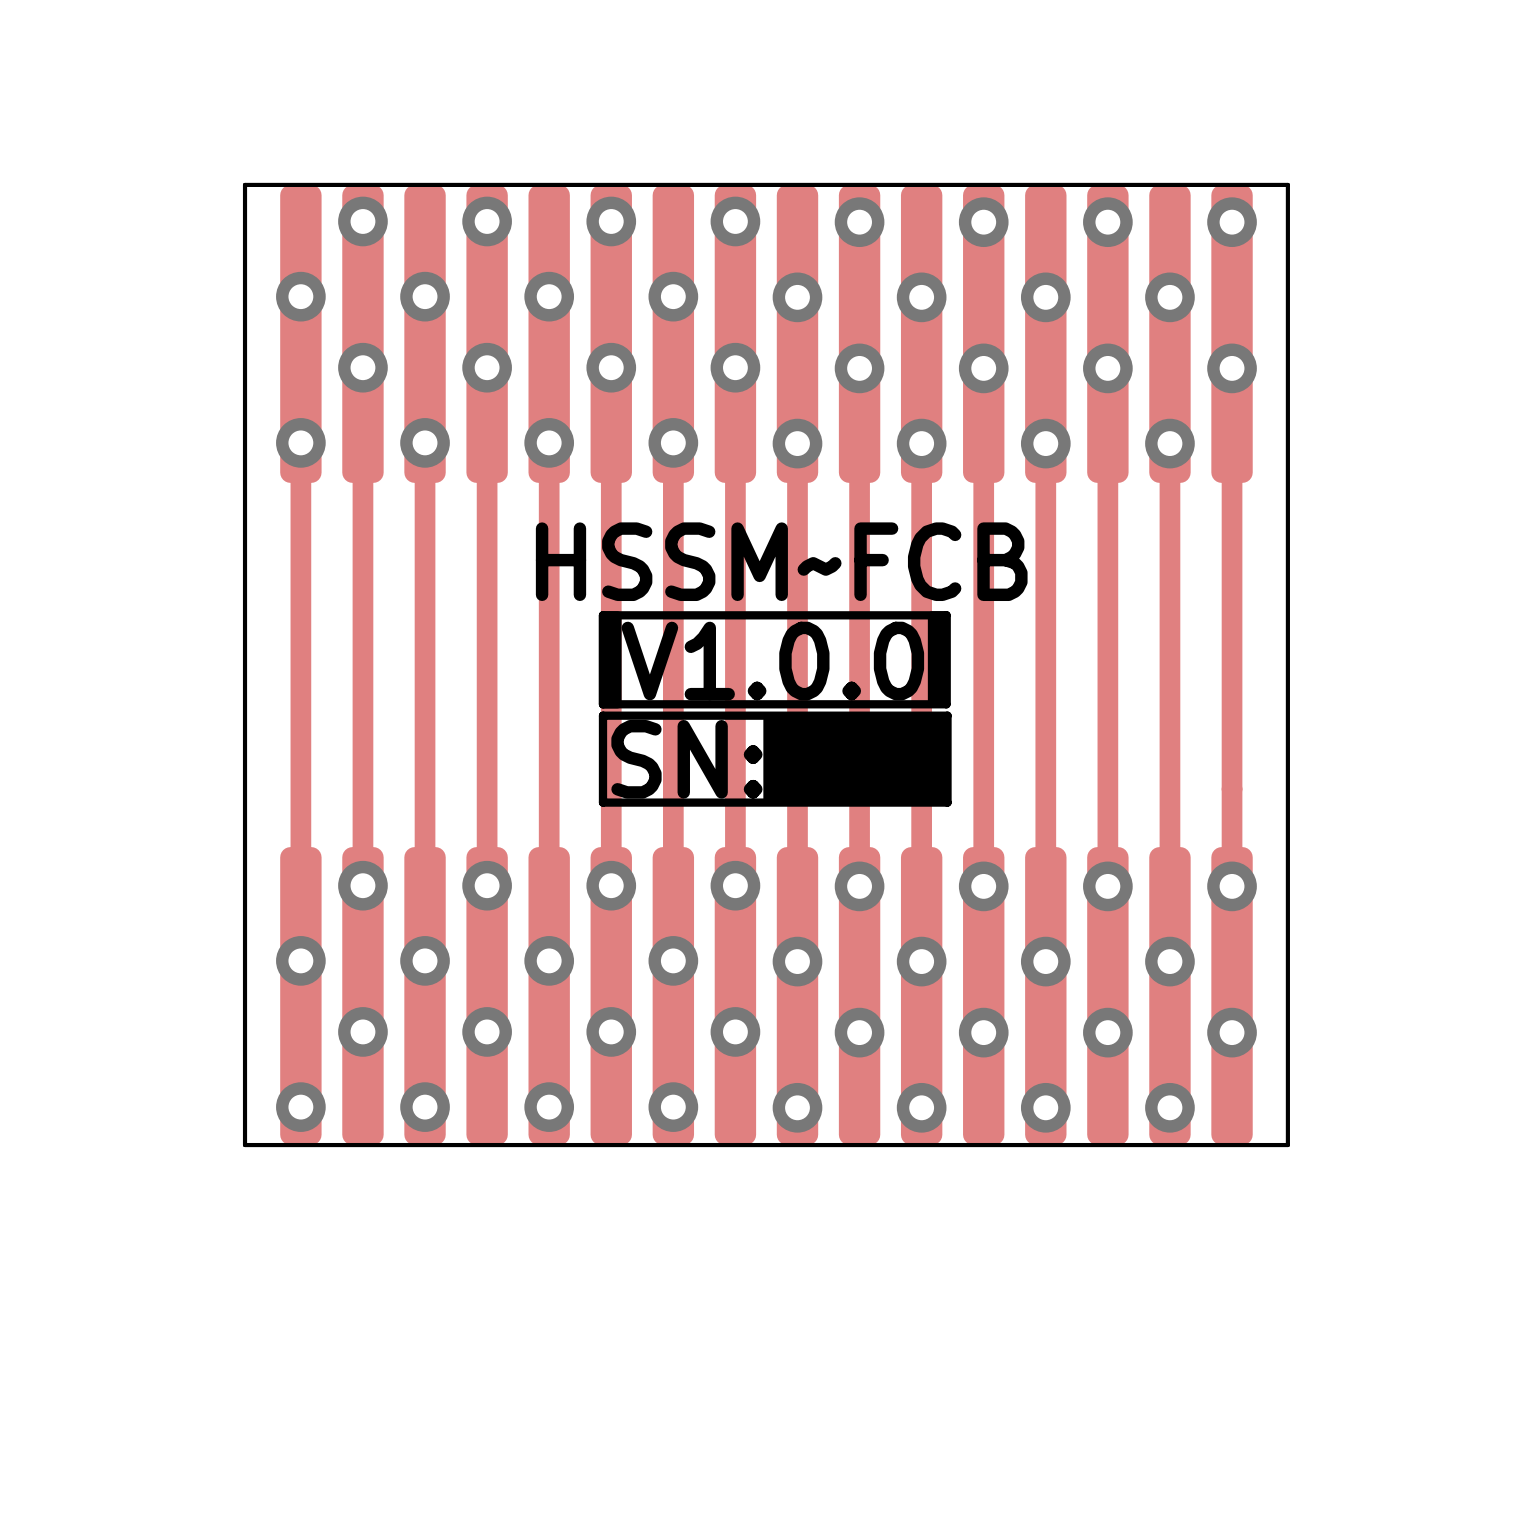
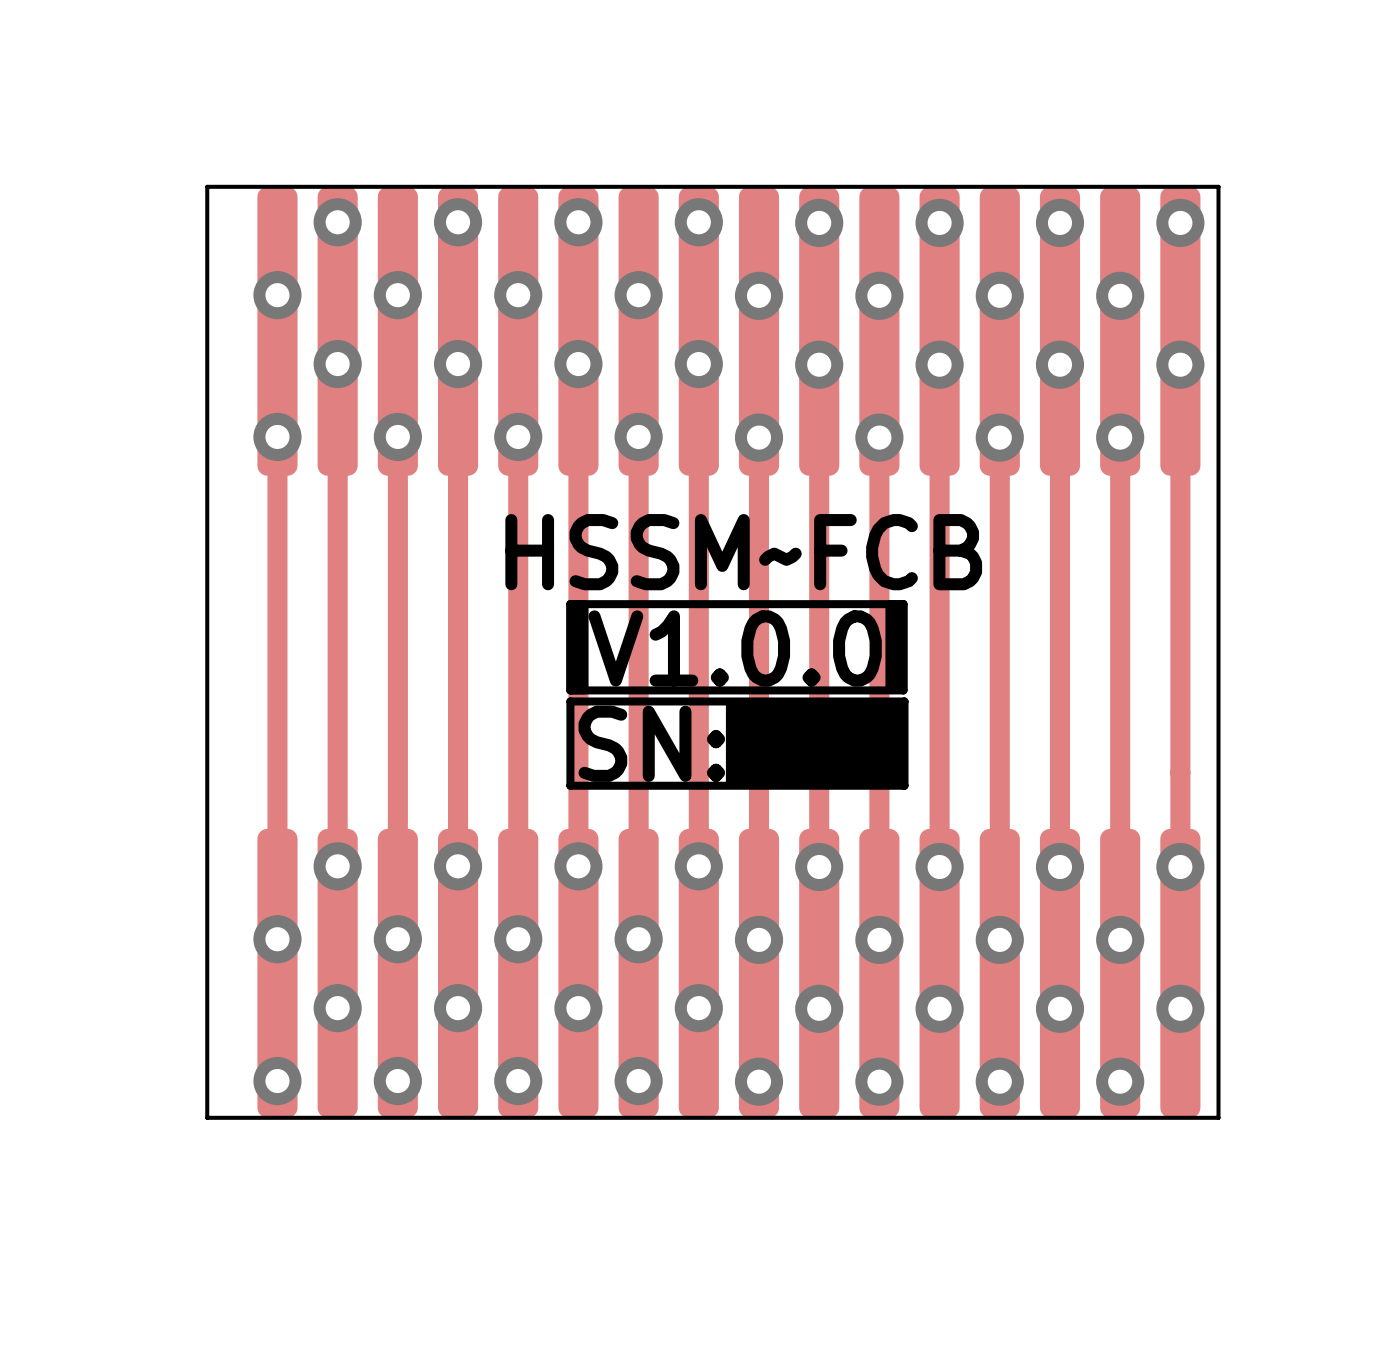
board edge: (245, 184) (245, 1145) -> (223, 186) (207, 186) (207, 1117) (223, 1117)
board edge: (1271, 184) (1287, 184) (1287, 1145) (1271, 1145) -> (1218, 186) (1218, 1117)

